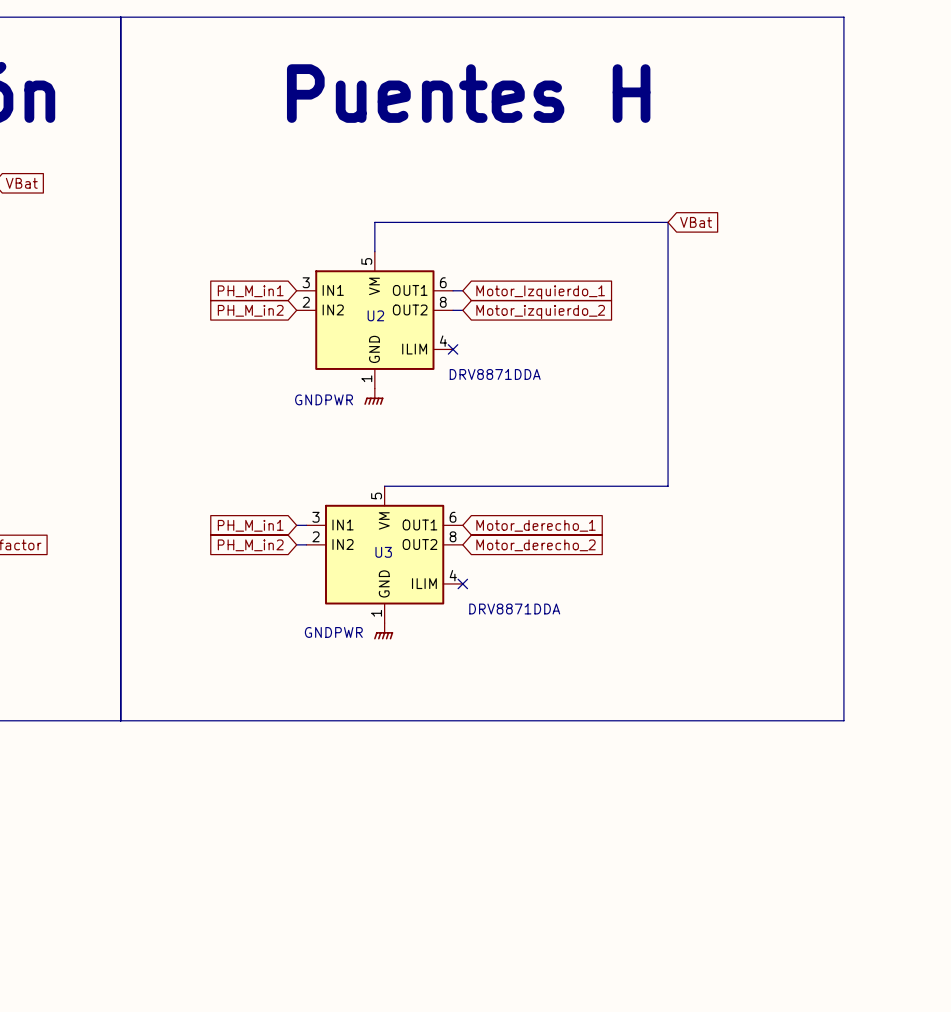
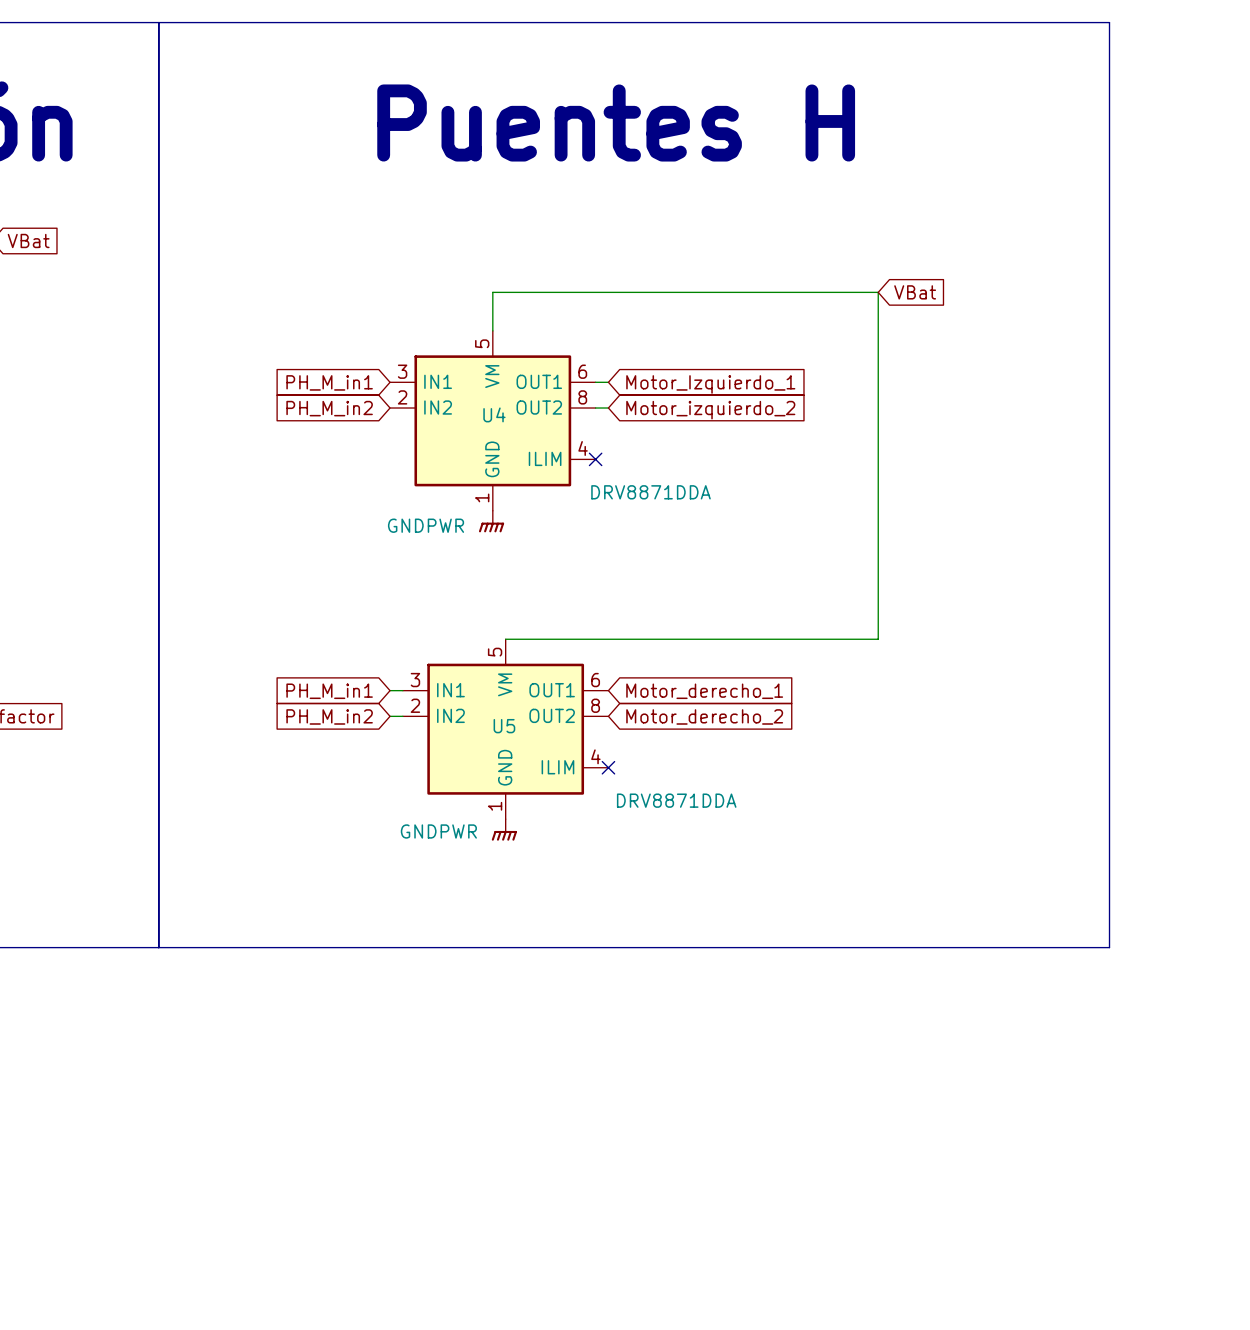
U2 name: U2 (375, 315) -> U4 (494, 414)
U3 name: U3 (383, 552) -> U5 (504, 726)

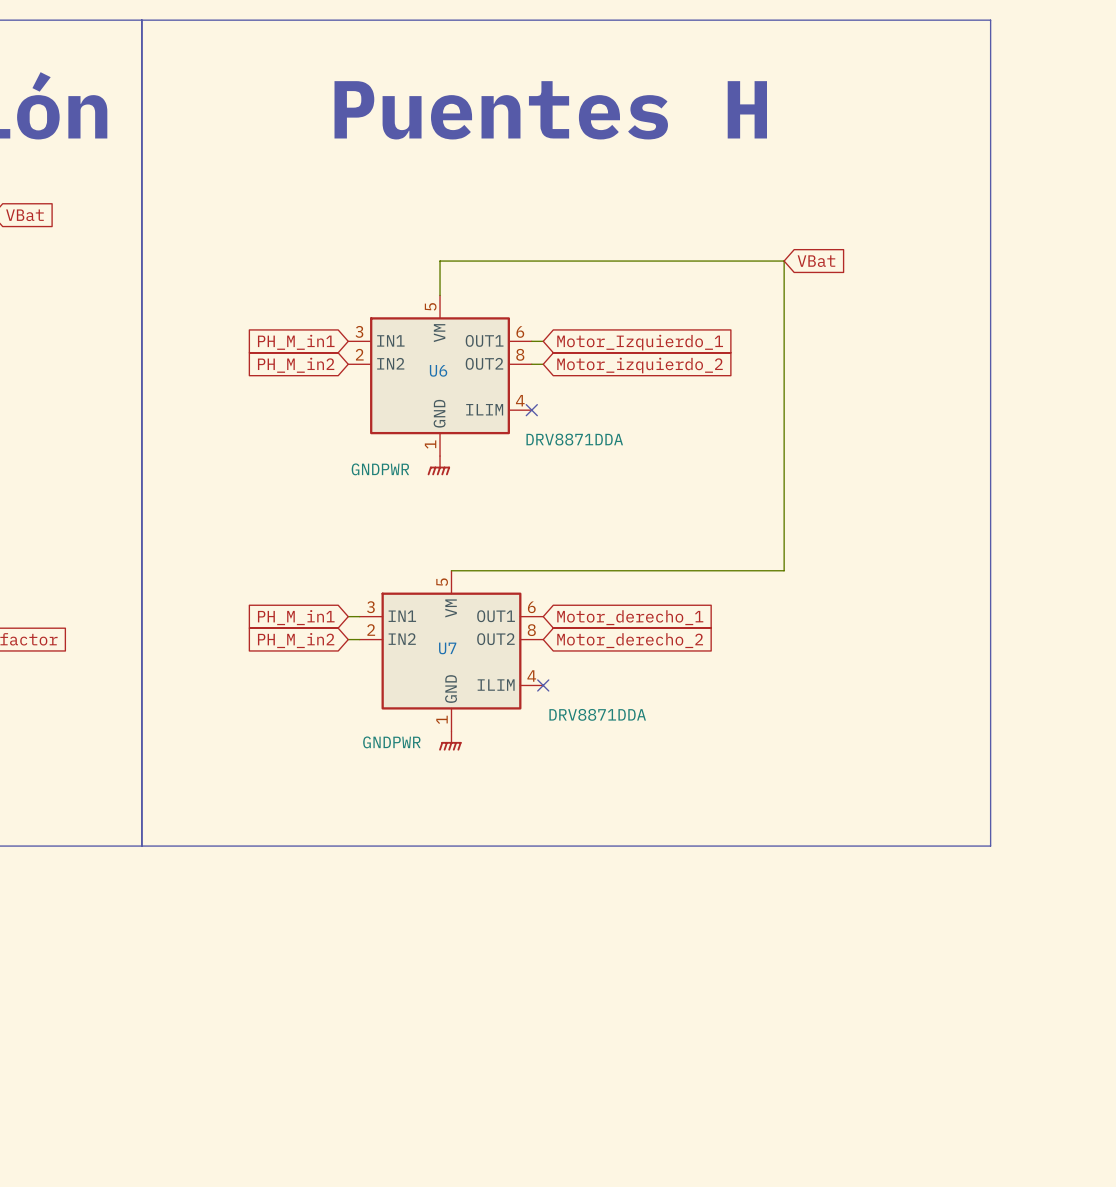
U4 name: U4 (494, 414) -> U6 (438, 370)
U5 name: U5 (504, 726) -> U7 (447, 648)

